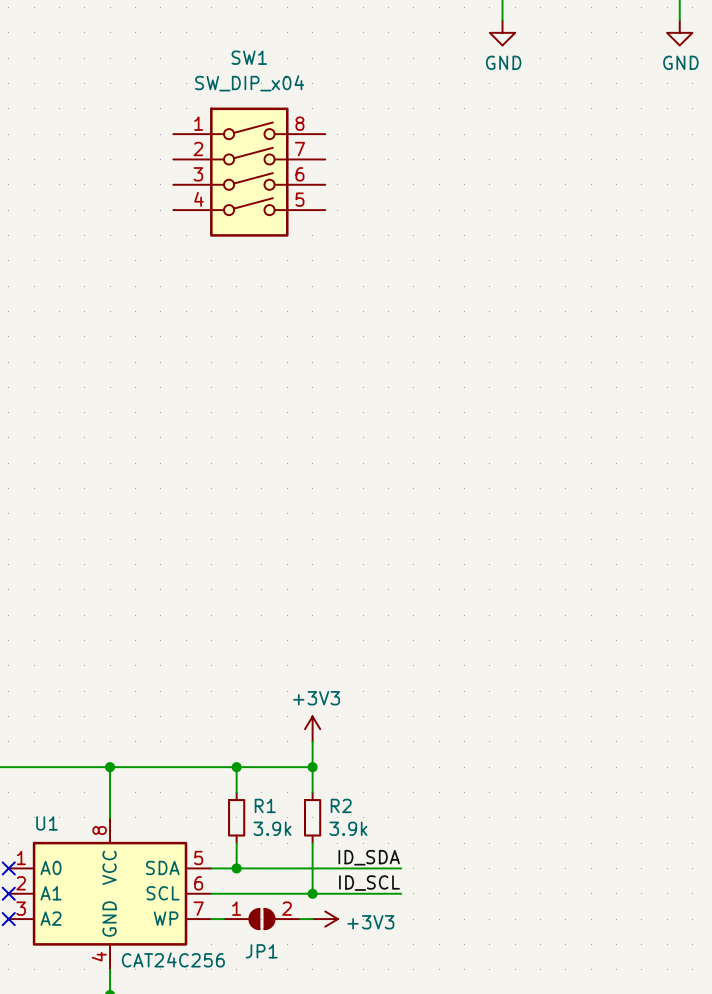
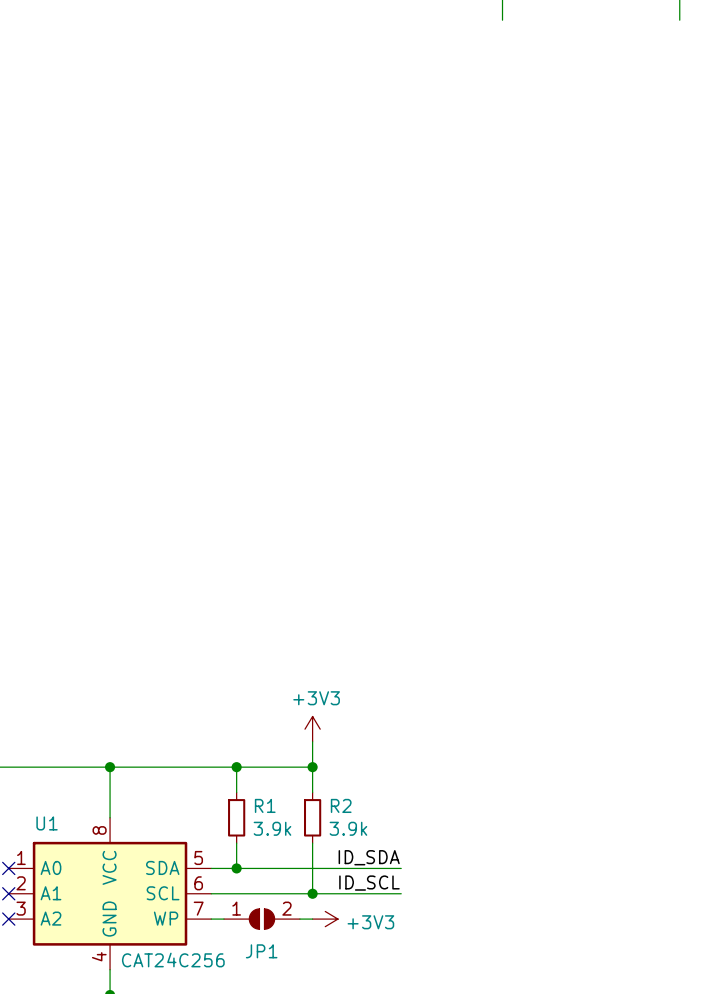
power symbol: GND (502, 32) -> none
power symbol: GND (679, 32) -> none
SW1: SW_DIP_x04 (249, 172) -> none

